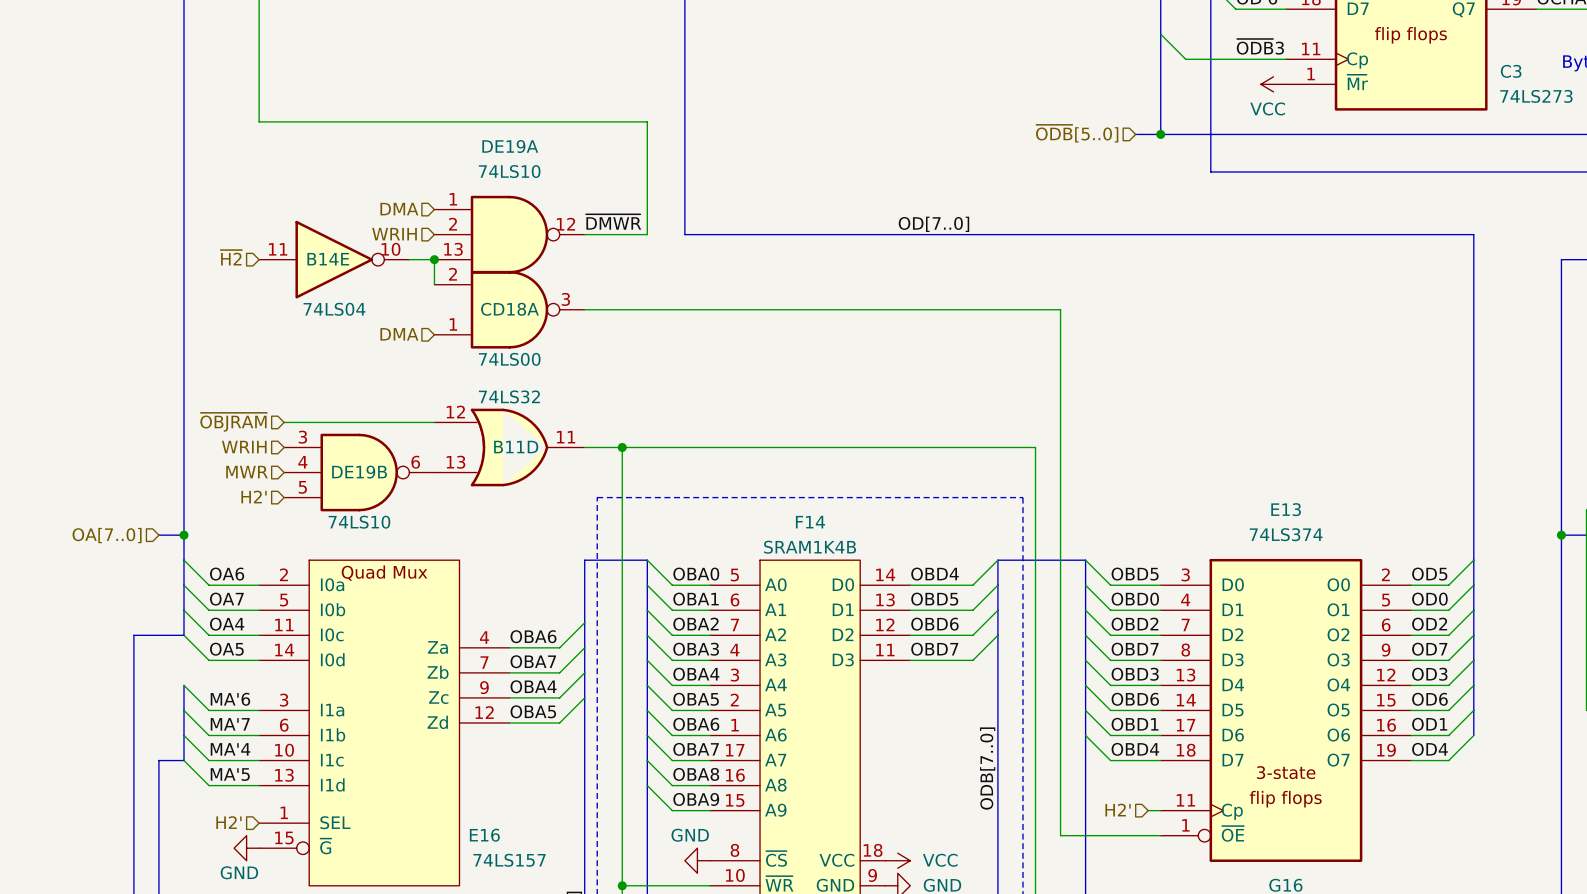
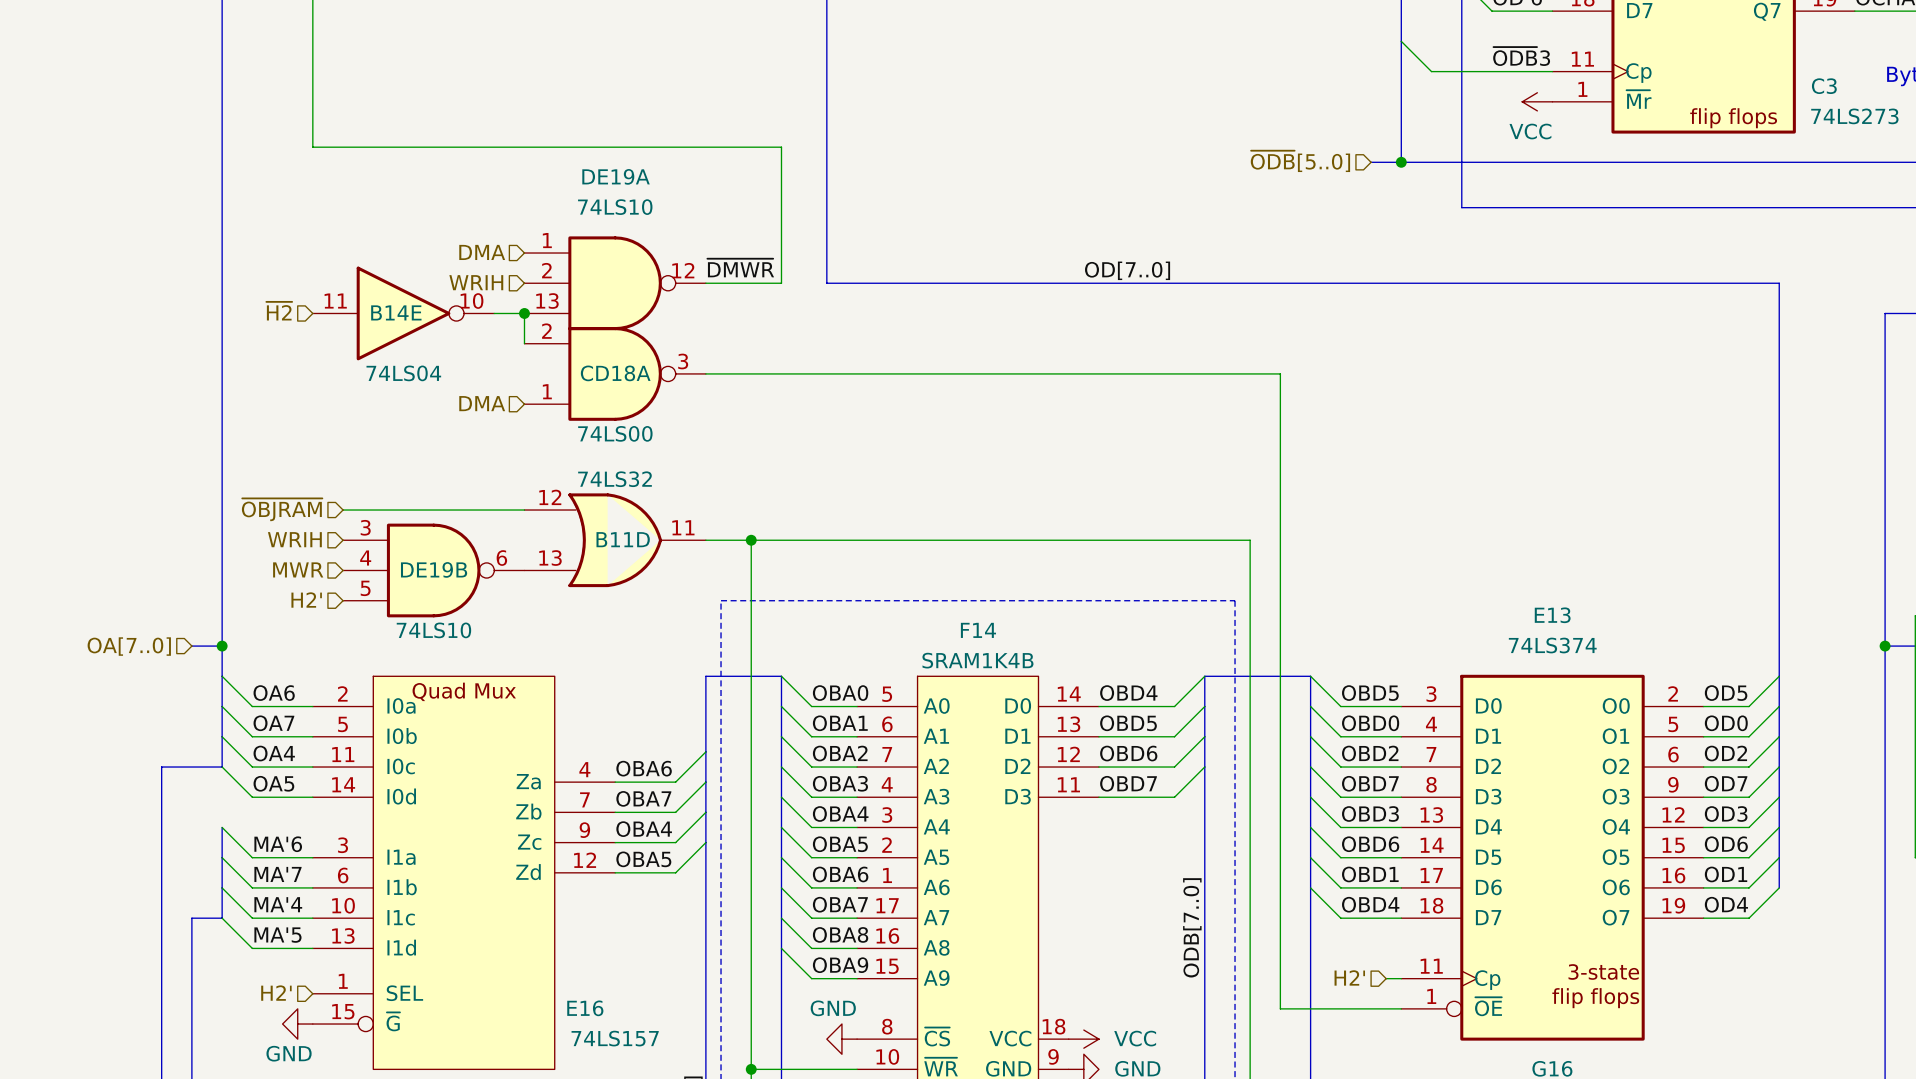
C3 text position: flip flops (1410, 35) -> flip flops (1733, 118)
E13 text position: 3-state (1286, 772) -> 3-state (1603, 971)
E13 text position: flip flops (1285, 799) -> flip flops (1595, 998)

